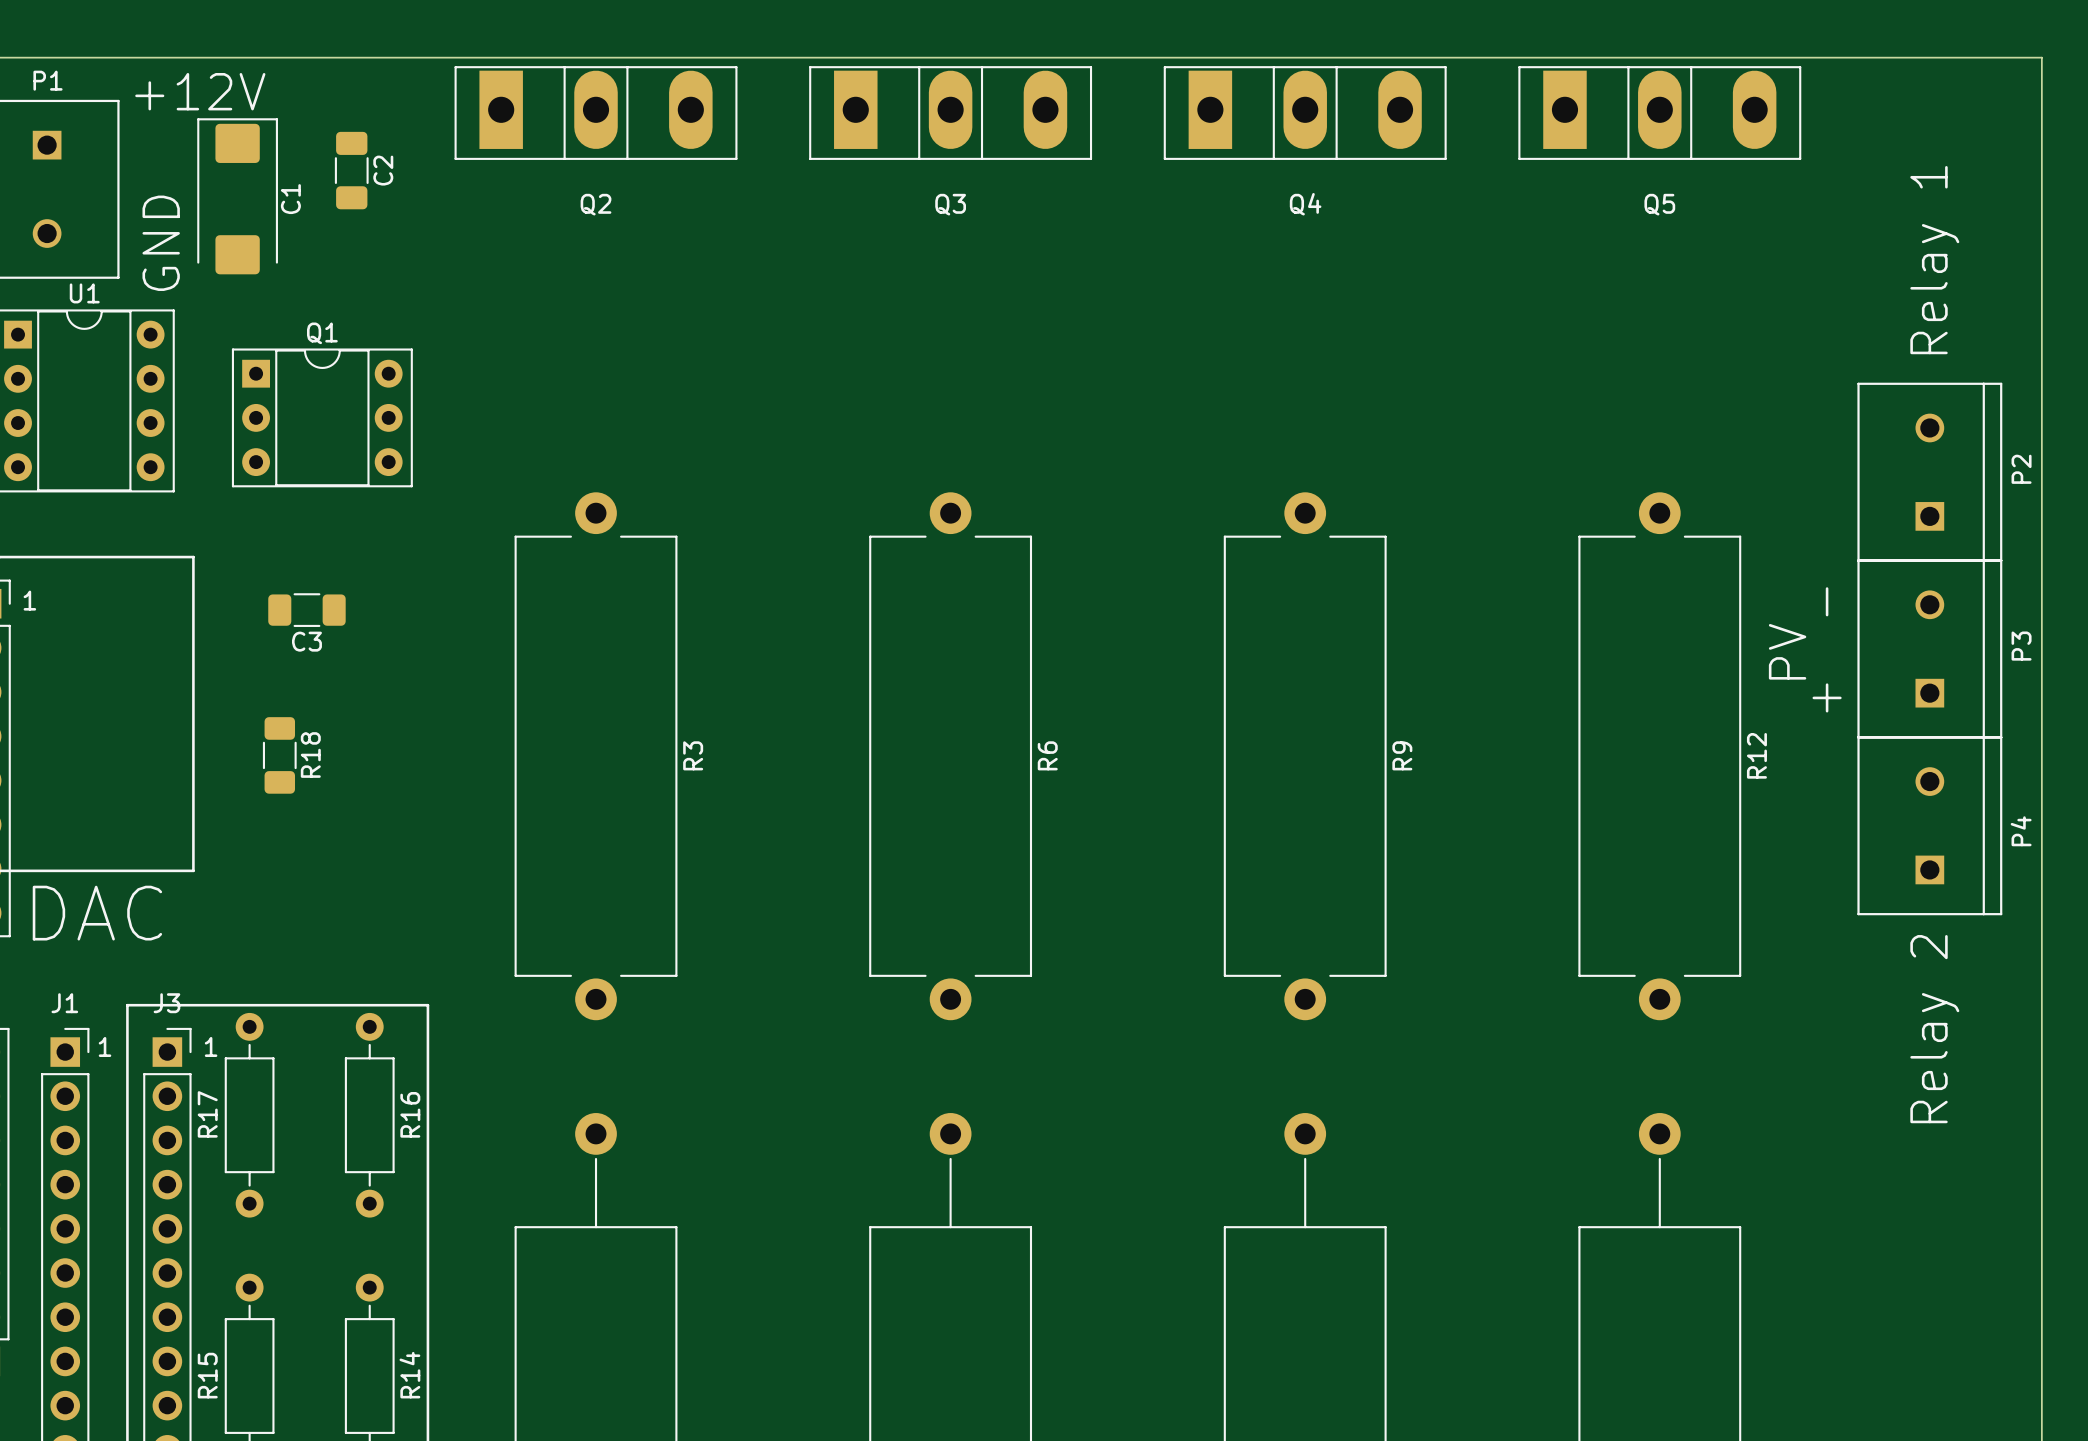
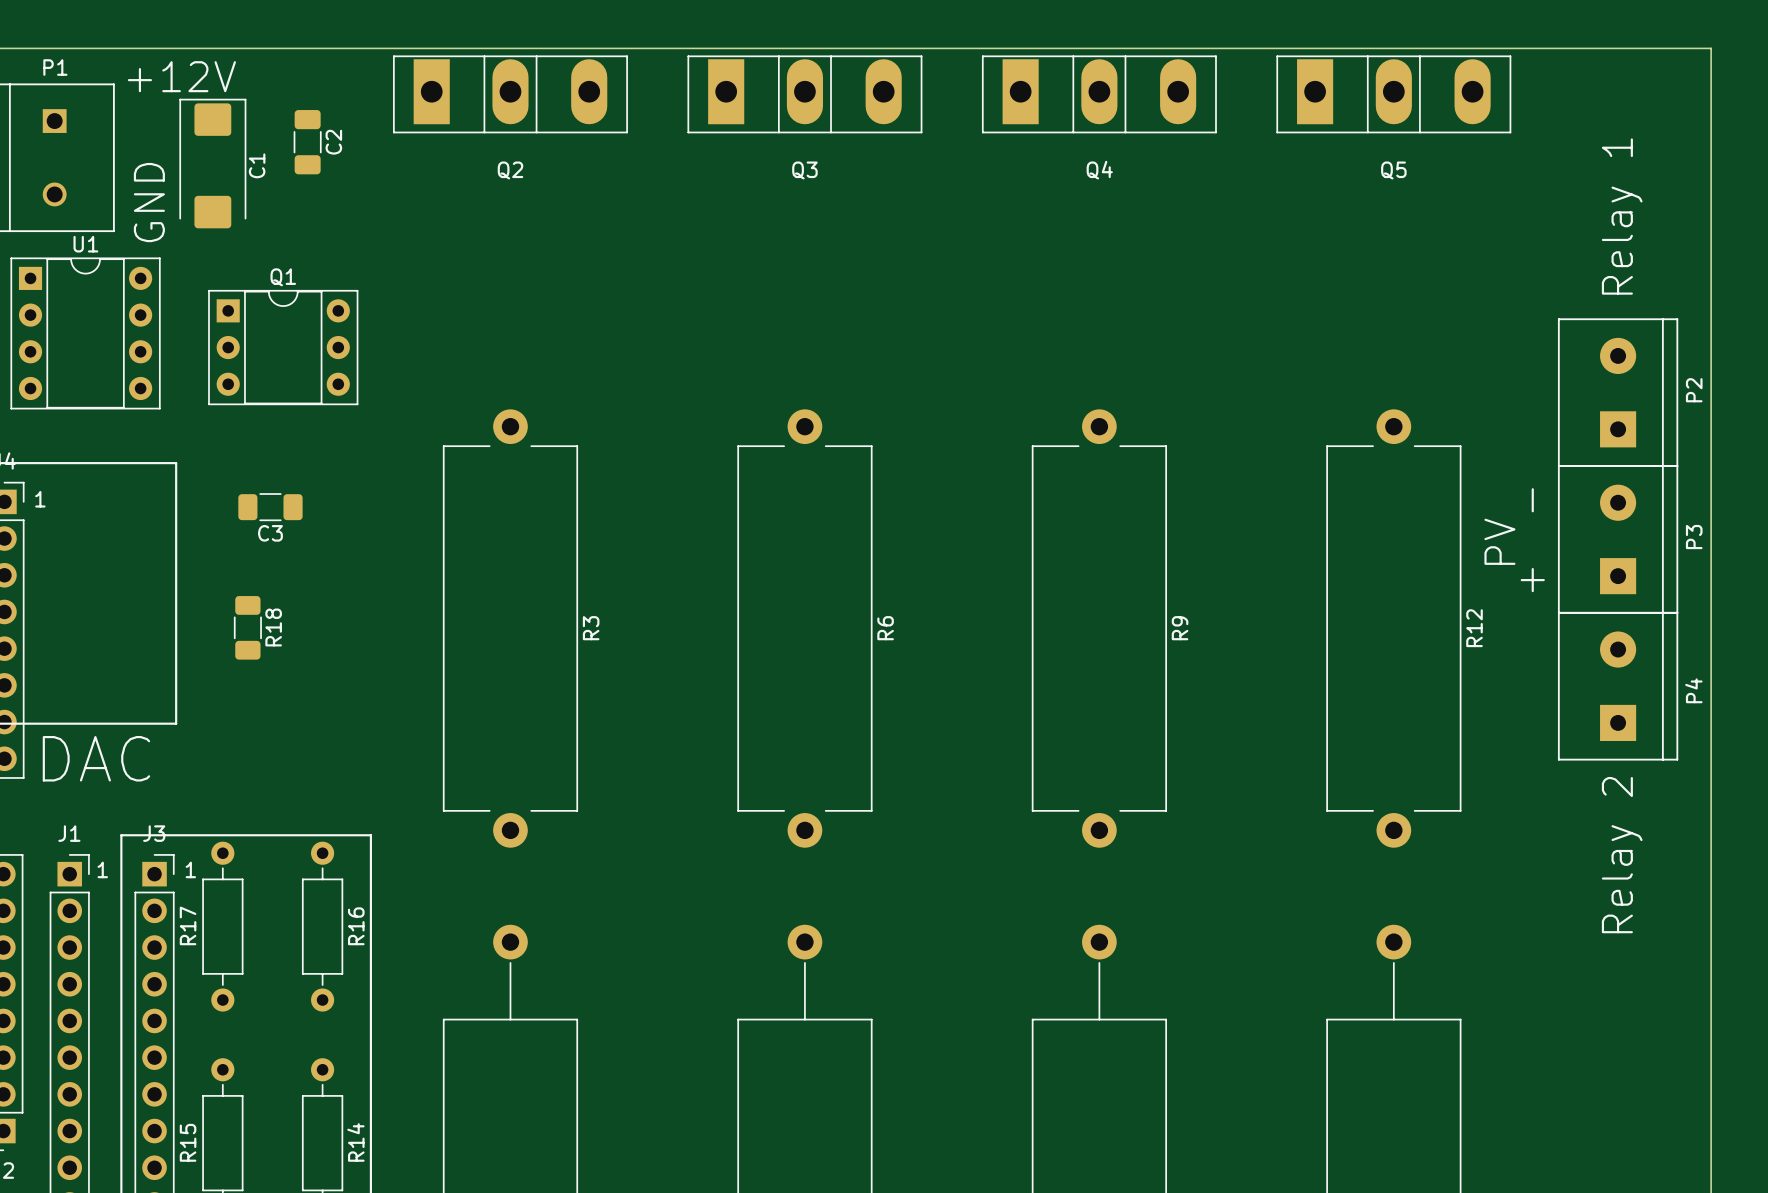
P2 footprint: [1857, 382, 2003, 562] -> [1557, 318, 1679, 467]
P3 footprint: [1857, 559, 2003, 739] -> [1557, 465, 1679, 614]
P4 footprint: [1857, 736, 2003, 916] -> [1557, 611, 1679, 761]

